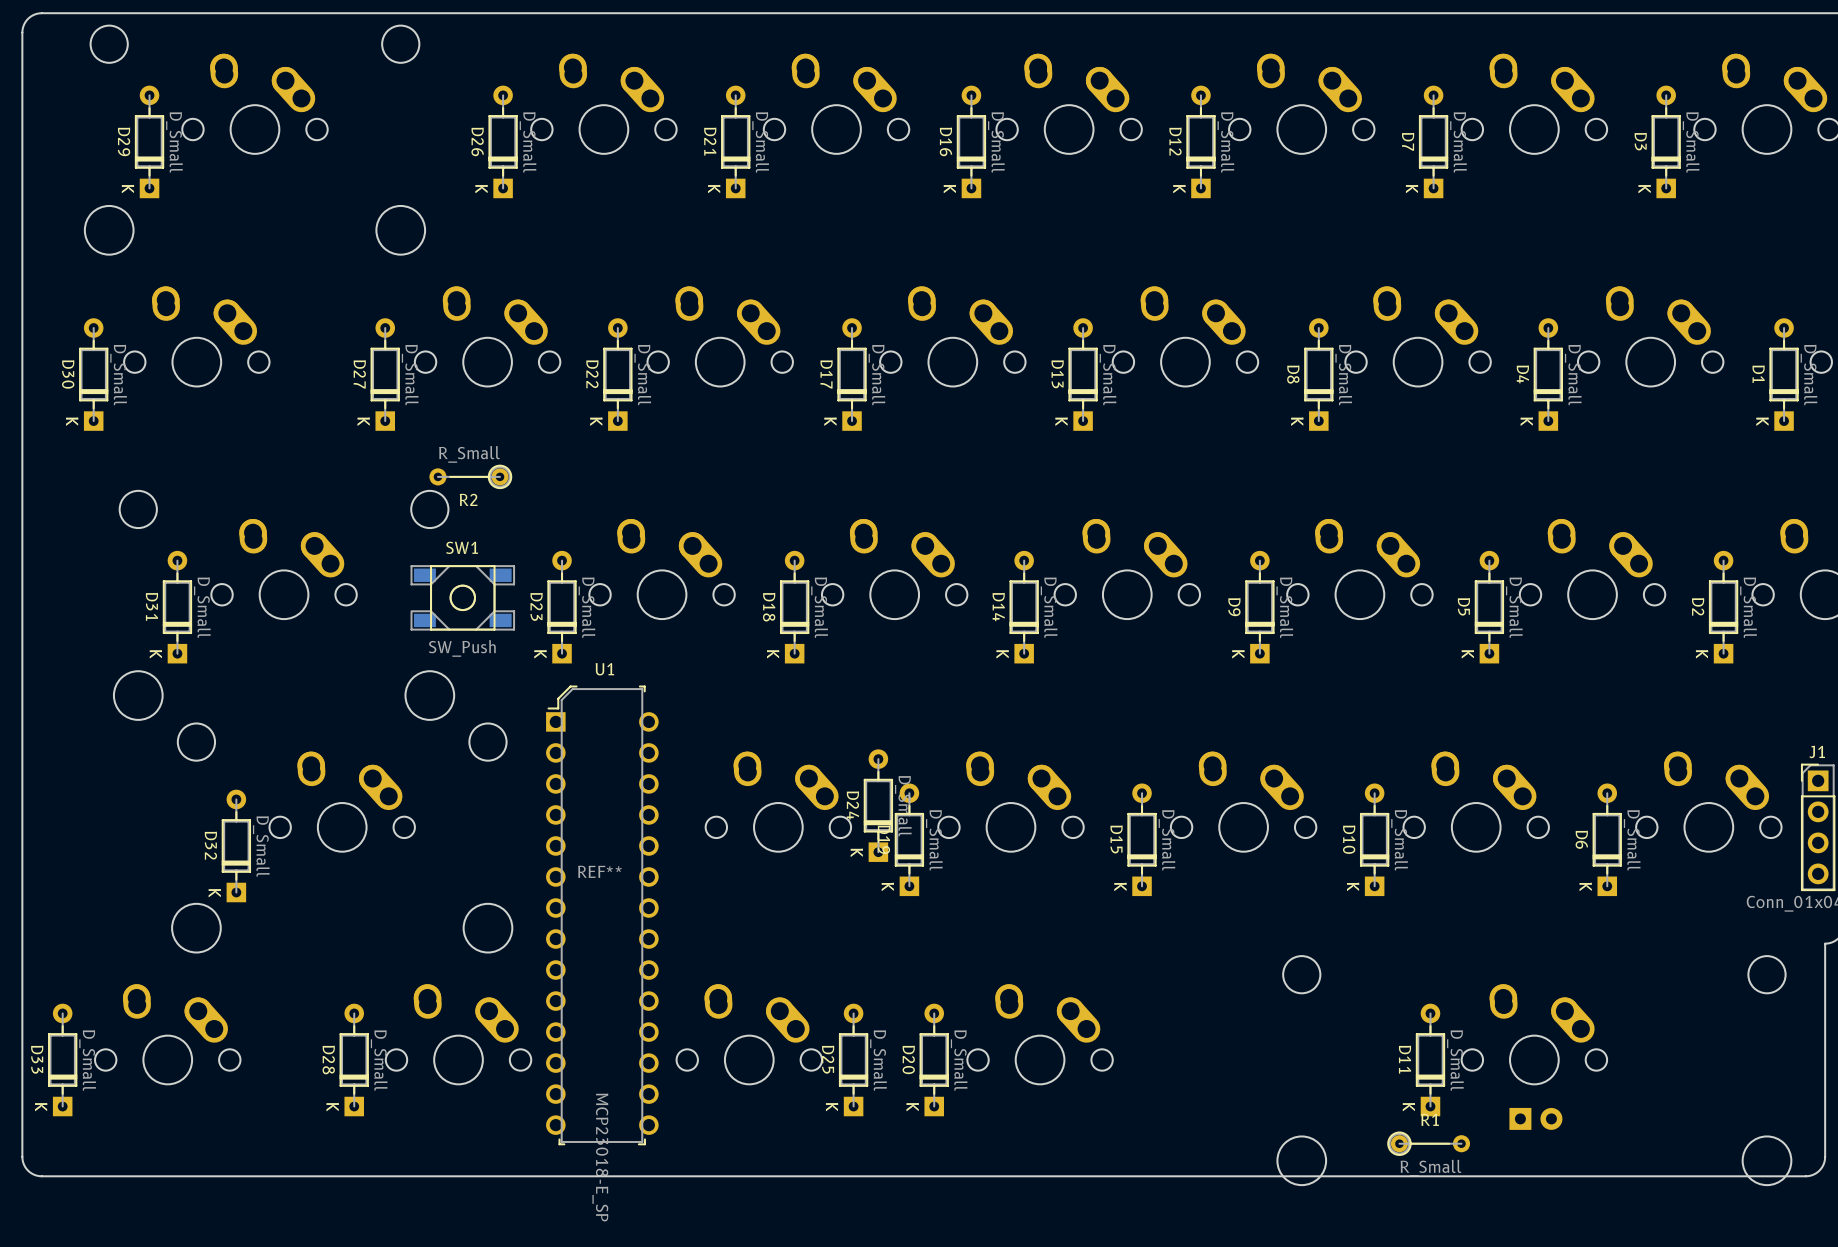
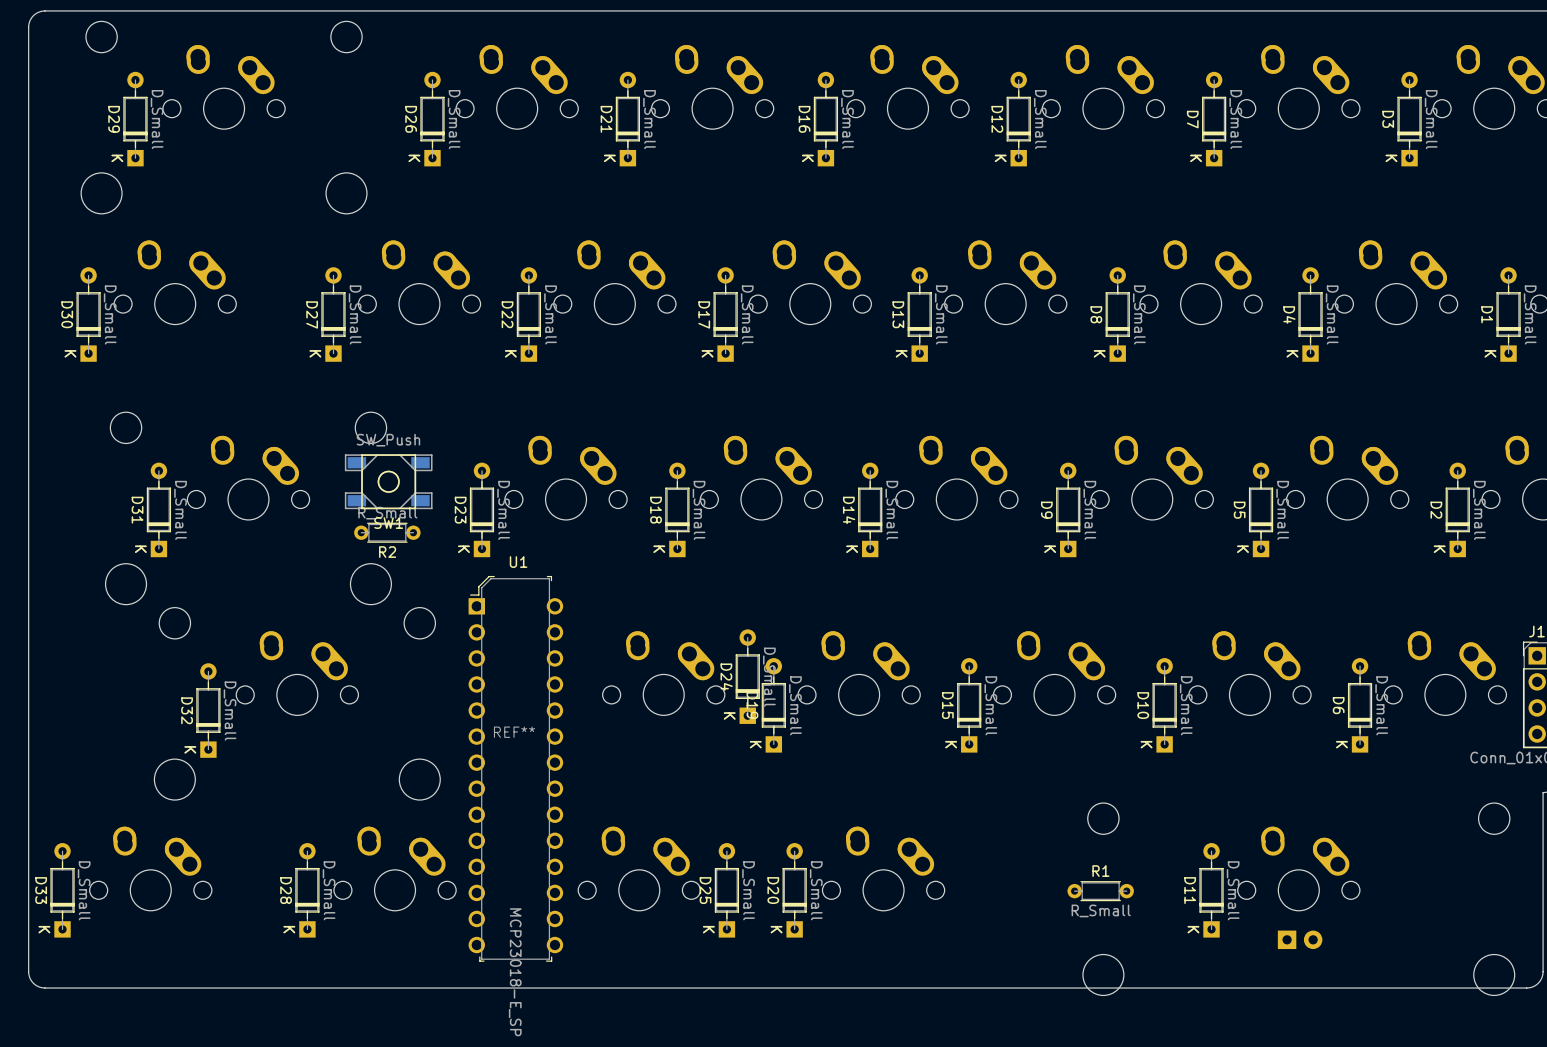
R2 footprint: [429, 464, 512, 489] -> [354, 522, 421, 543]
SW1 rotation: 0° (462, 597) -> 180° (388, 481)
R1 footprint: [1387, 1131, 1471, 1156] -> [1067, 881, 1134, 902]

